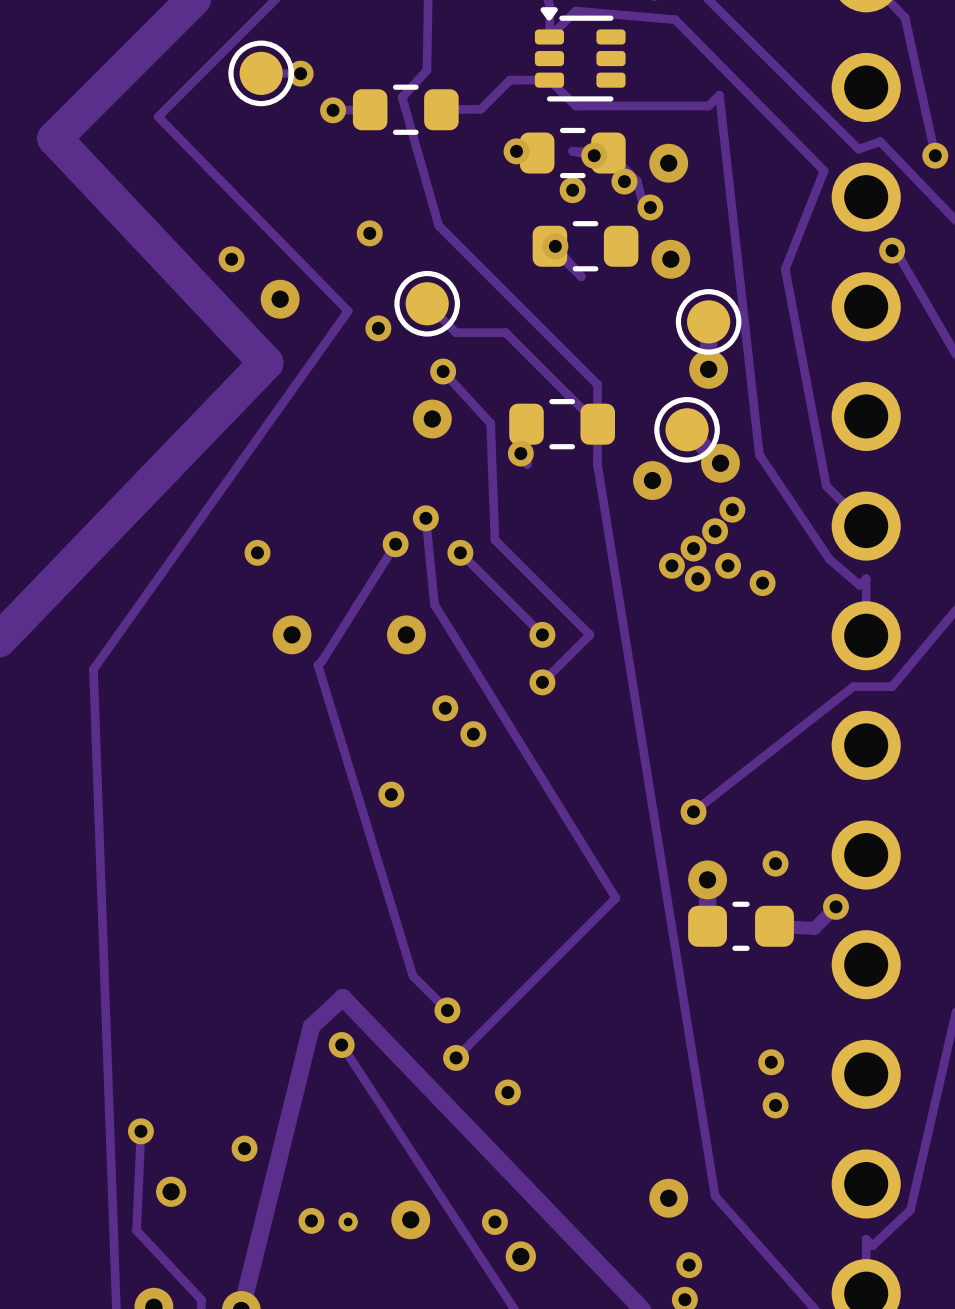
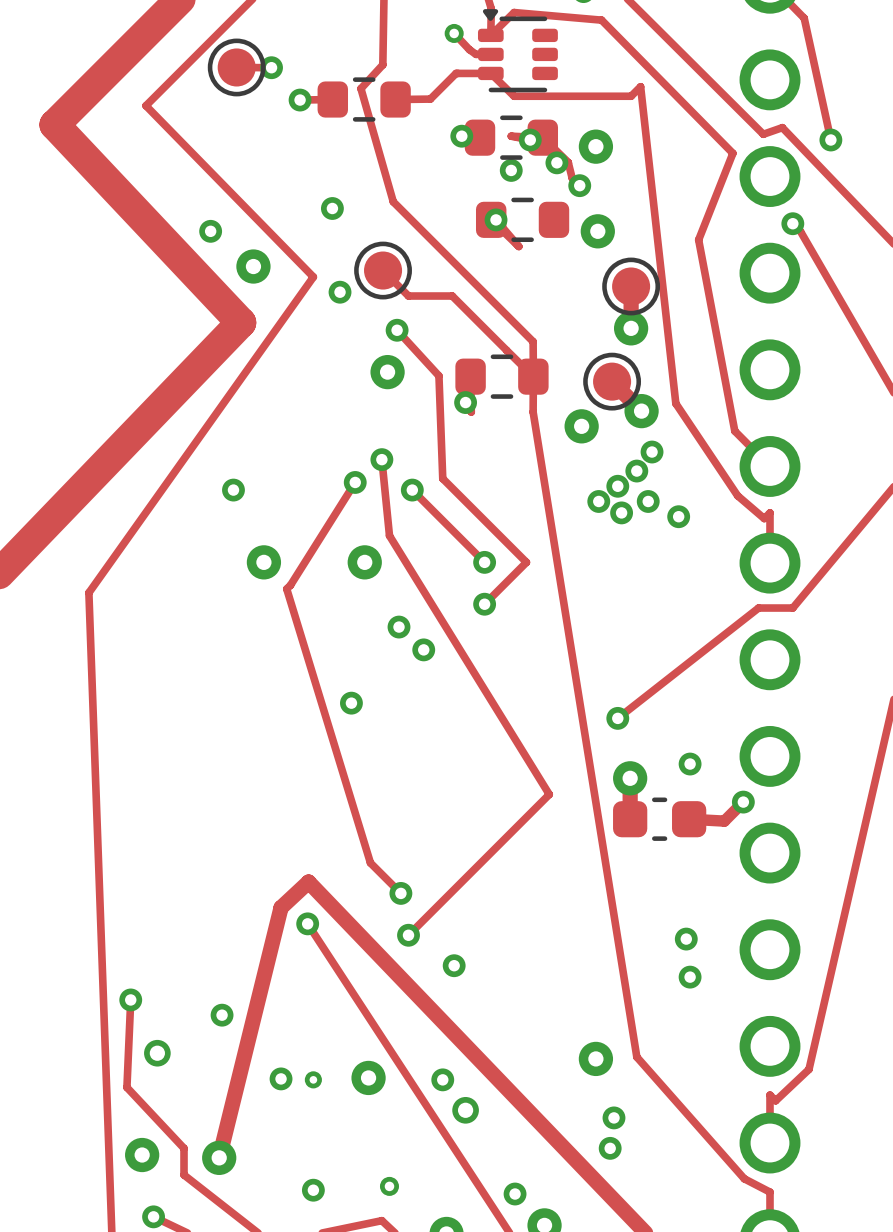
track: none -> (454, 33) (469, 49) (476, 54) (482, 54)
via: none -> (454, 33)

